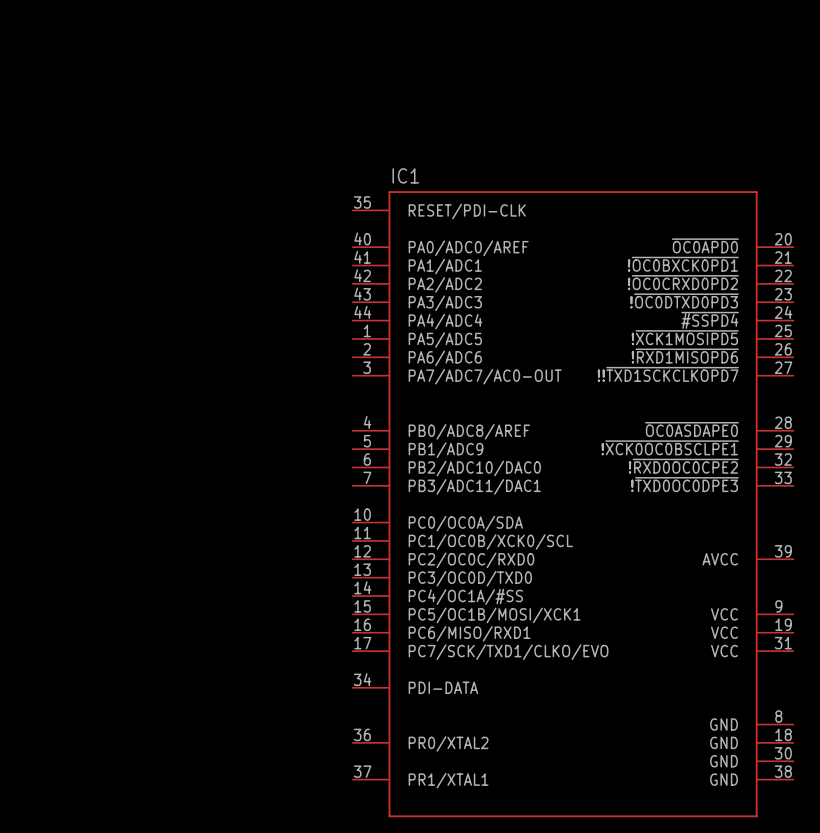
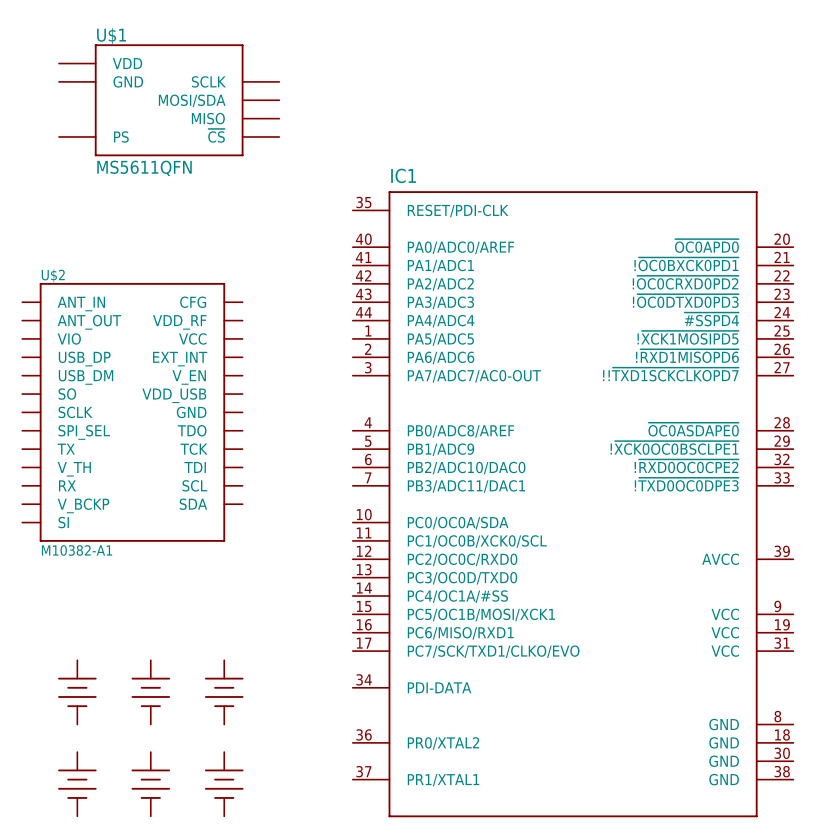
U$1: none -> MS5611QFN (169, 100)
U$2: none -> M10382-A1 (132, 412)
part: none -> (77, 692)
part: none -> (150, 692)
part: none -> (224, 692)
part: none -> (77, 784)
part: none -> (150, 784)
part: none -> (224, 784)

